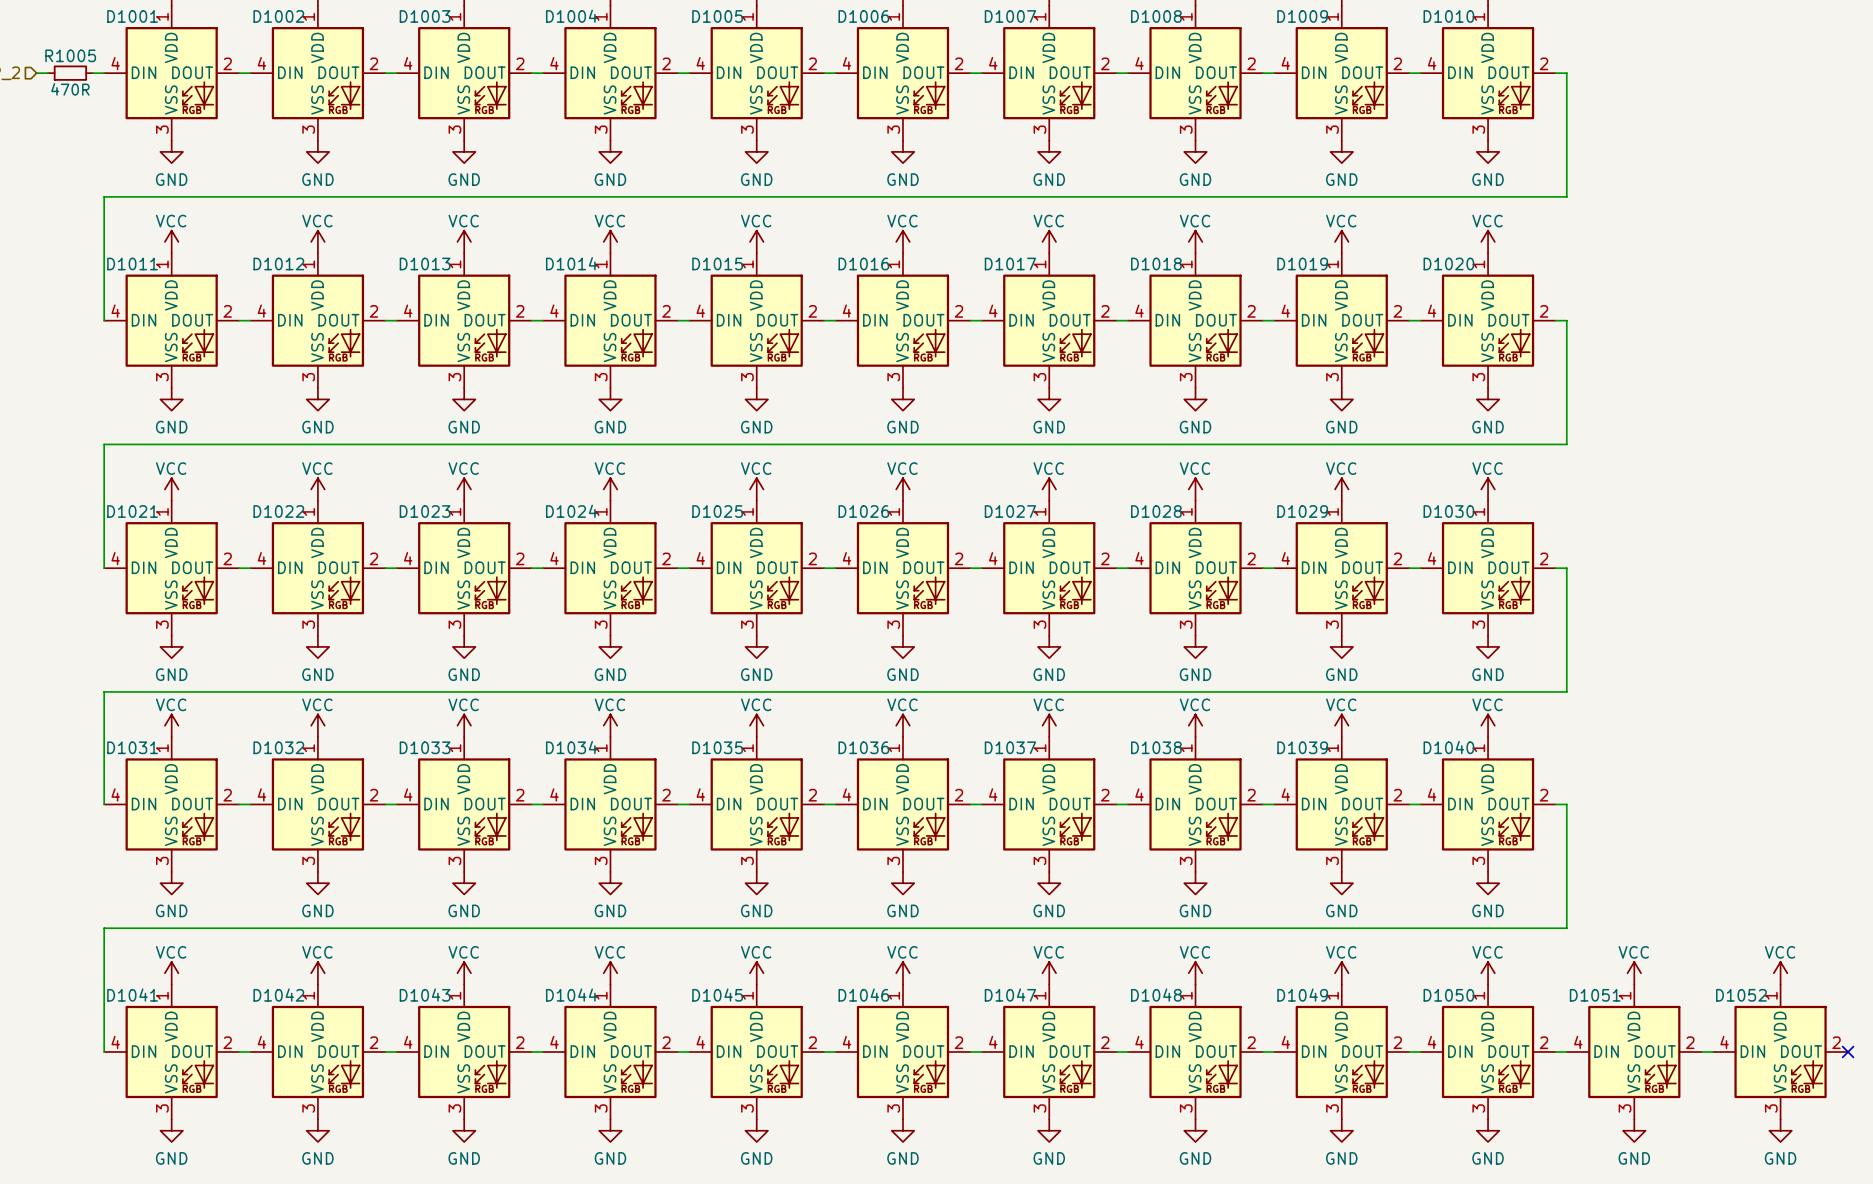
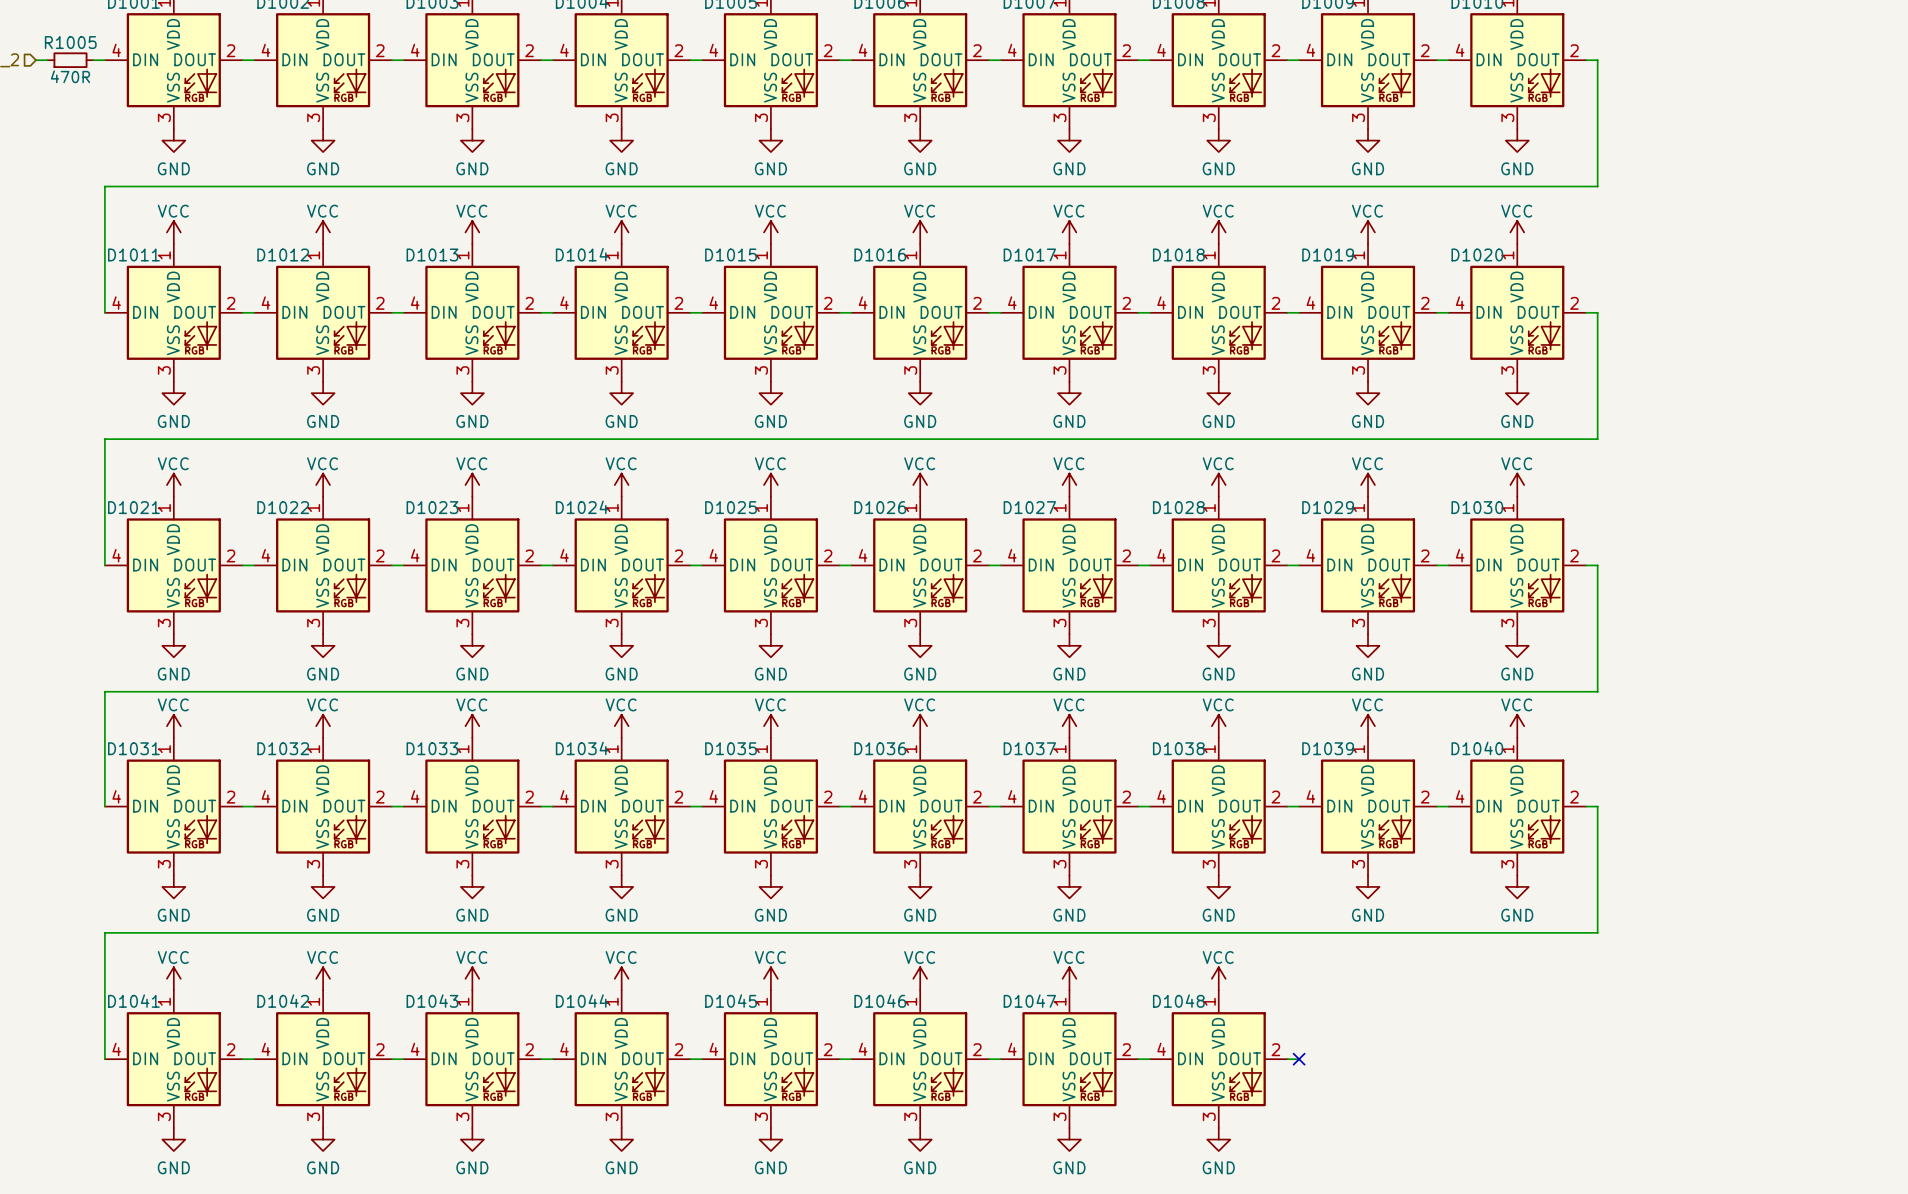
power symbol: VCC (1341, 973) -> none
power symbol: VCC (1488, 973) -> none
power symbol: VCC (1634, 973) -> none
power symbol: VCC (1780, 973) -> none
no-connect mark: none -> (1299, 1059)
D1049: (1341, 1051) -> none
wire: (1409, 1051) (1420, 1051) -> none
D1050: (1488, 1051) -> none
wire: (1555, 1051) (1566, 1051) -> none
D1051: (1634, 1051) -> none
wire: (1701, 1051) (1713, 1051) -> none
D1052: (1780, 1051) -> none
no-connect mark: (1848, 1051) -> none
power symbol: GND (1341, 1130) -> none
power symbol: GND (1488, 1130) -> none
power symbol: GND (1634, 1130) -> none
power symbol: GND (1780, 1130) -> none

